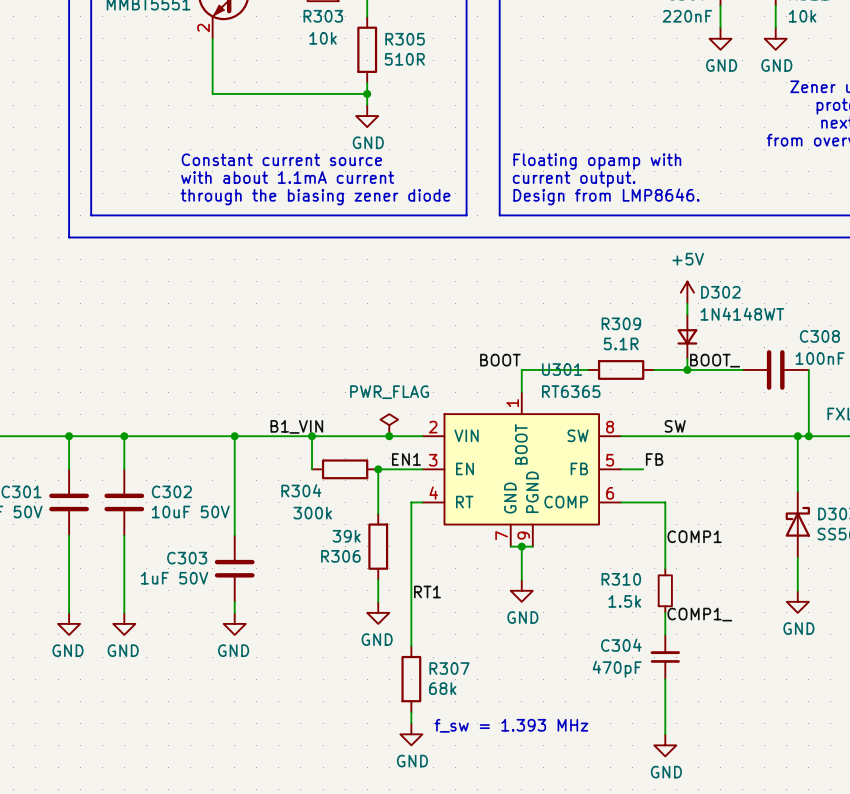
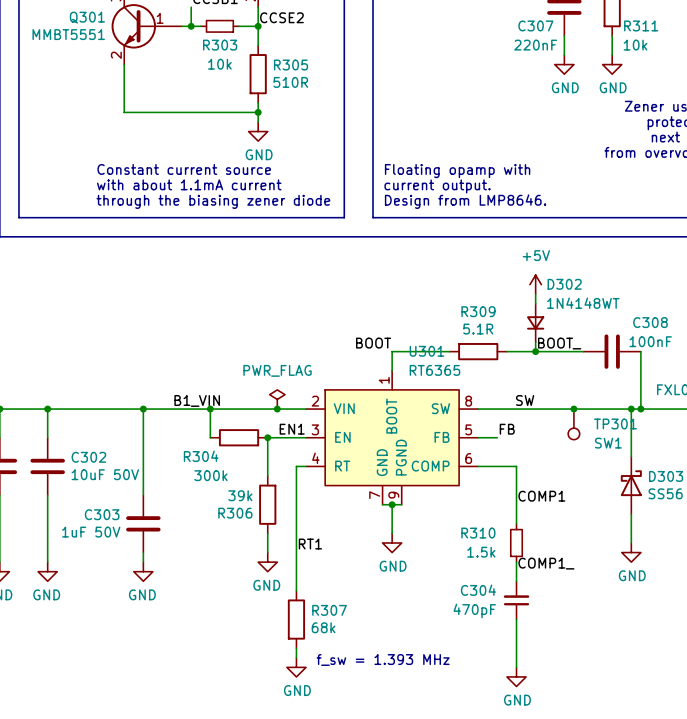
junction: none -> (573, 409)
TP301: none -> SW1 (573, 424)

